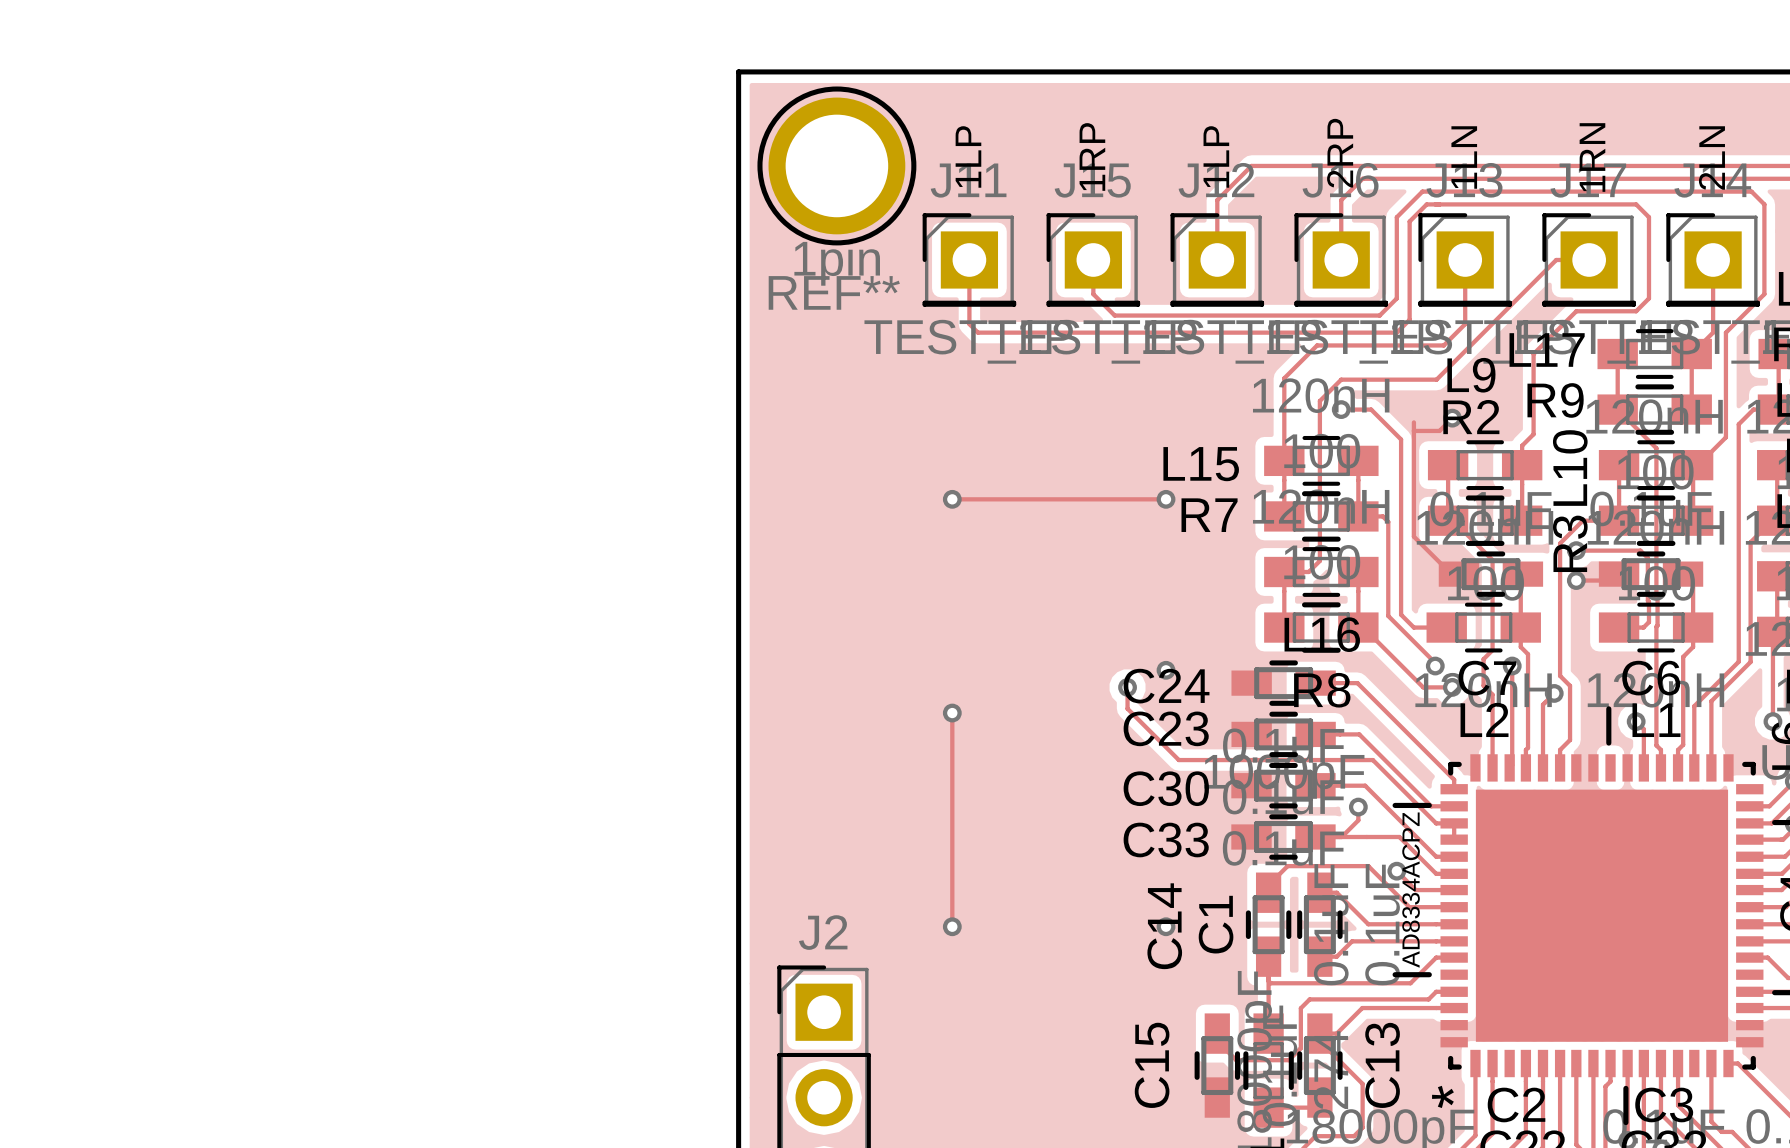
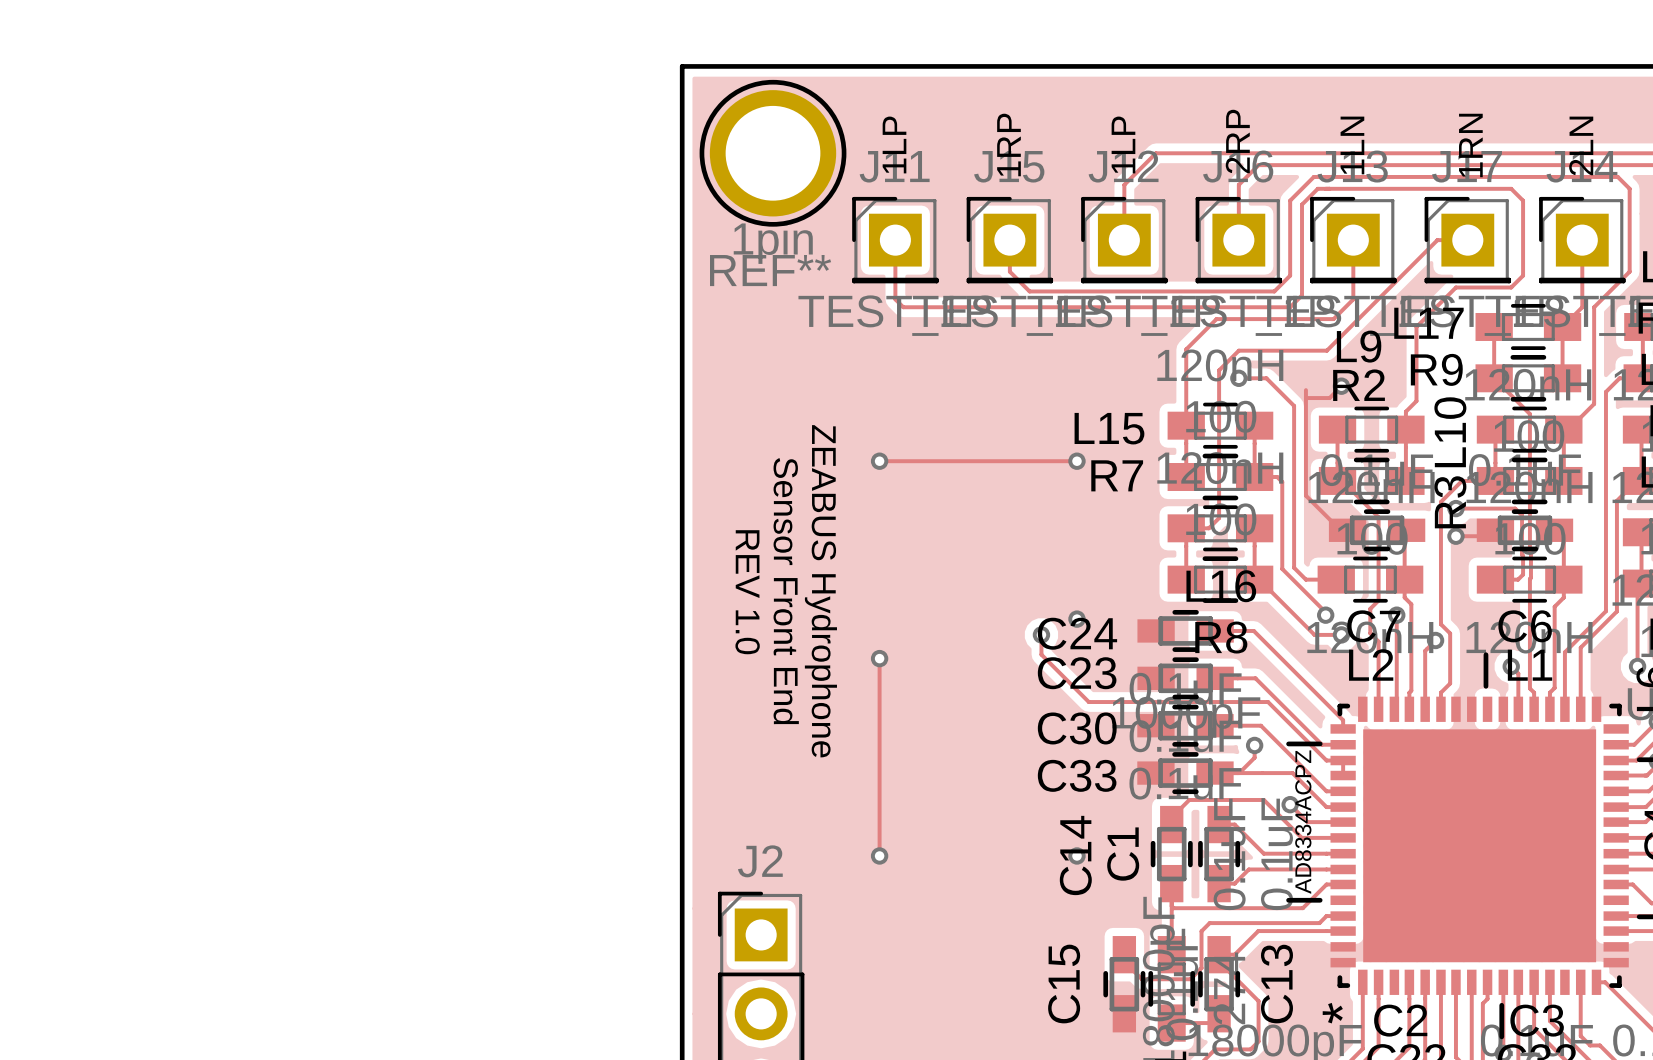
text: none -> Sensor Front End (786, 591)
text: none -> ZEABUS Hydrophone (820, 591)
text: none -> REV 1.0 (747, 592)

